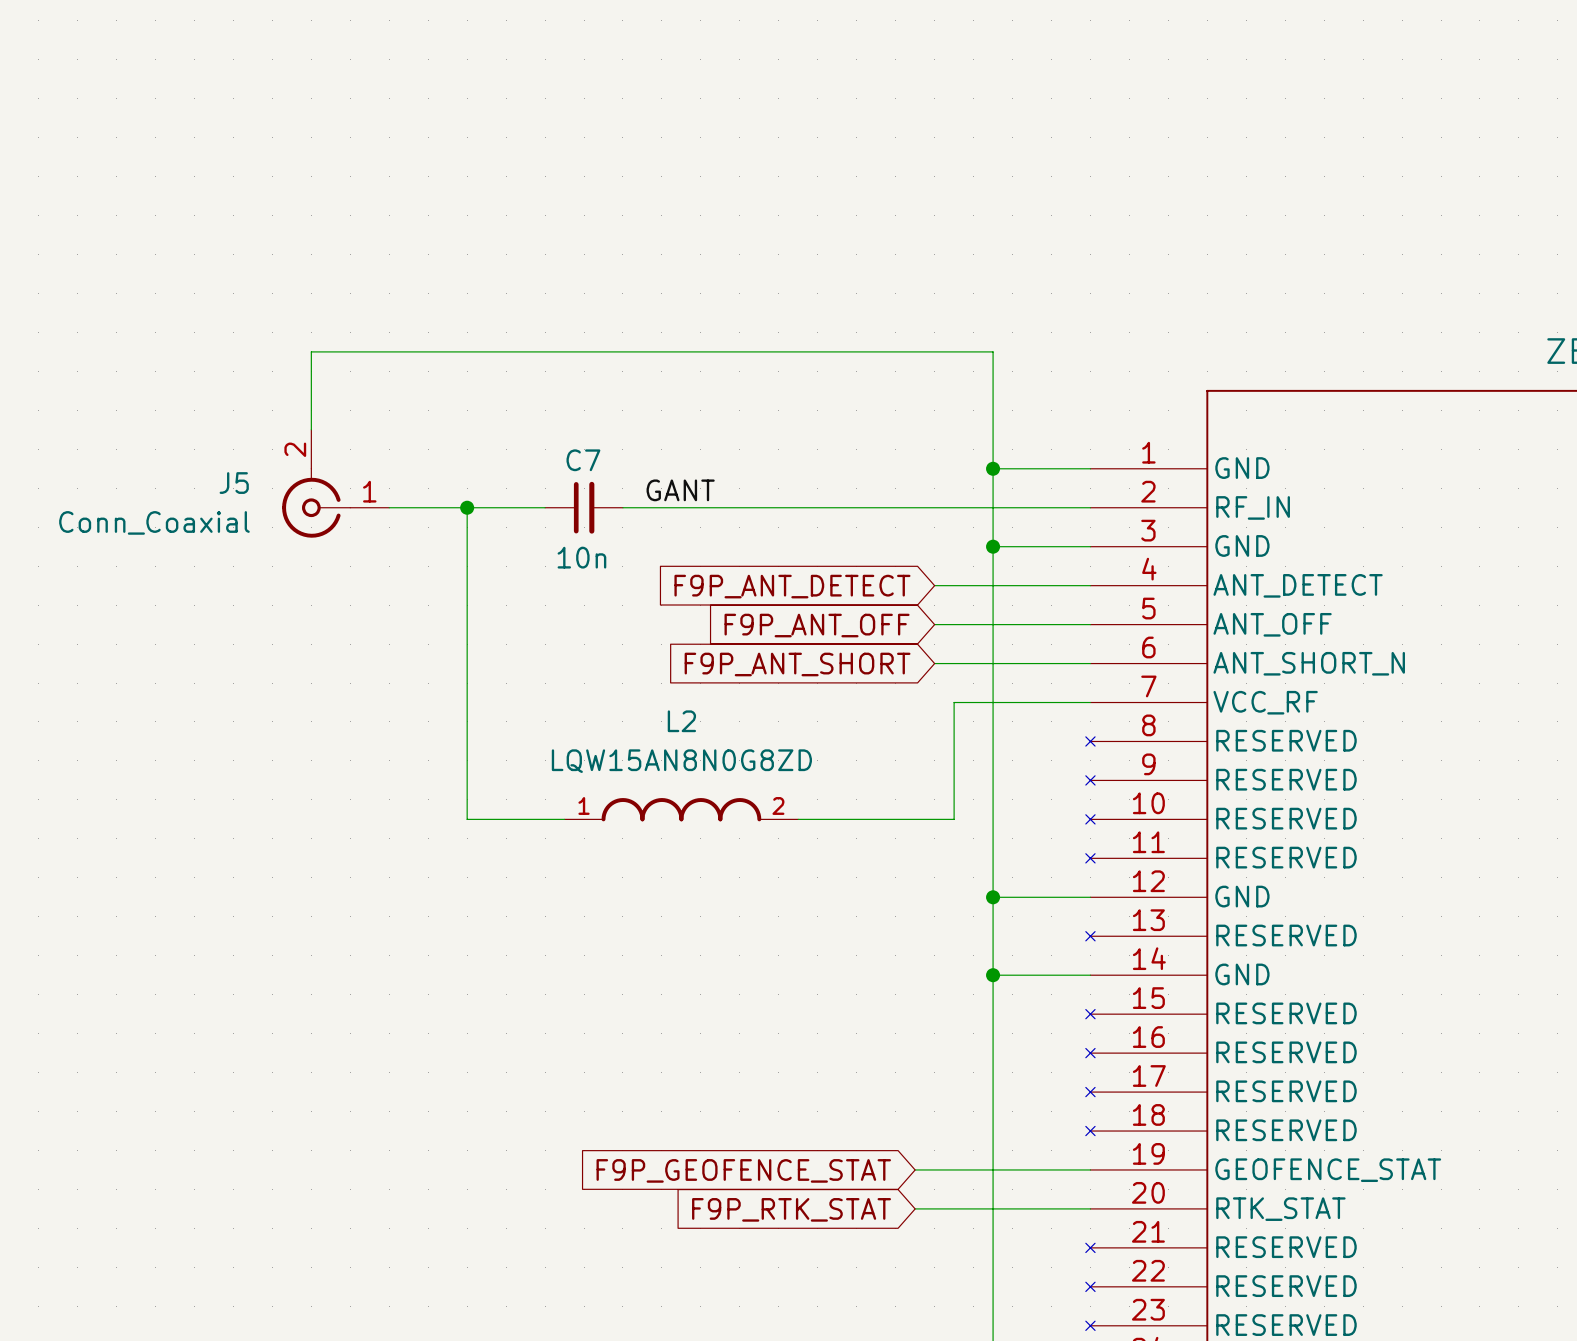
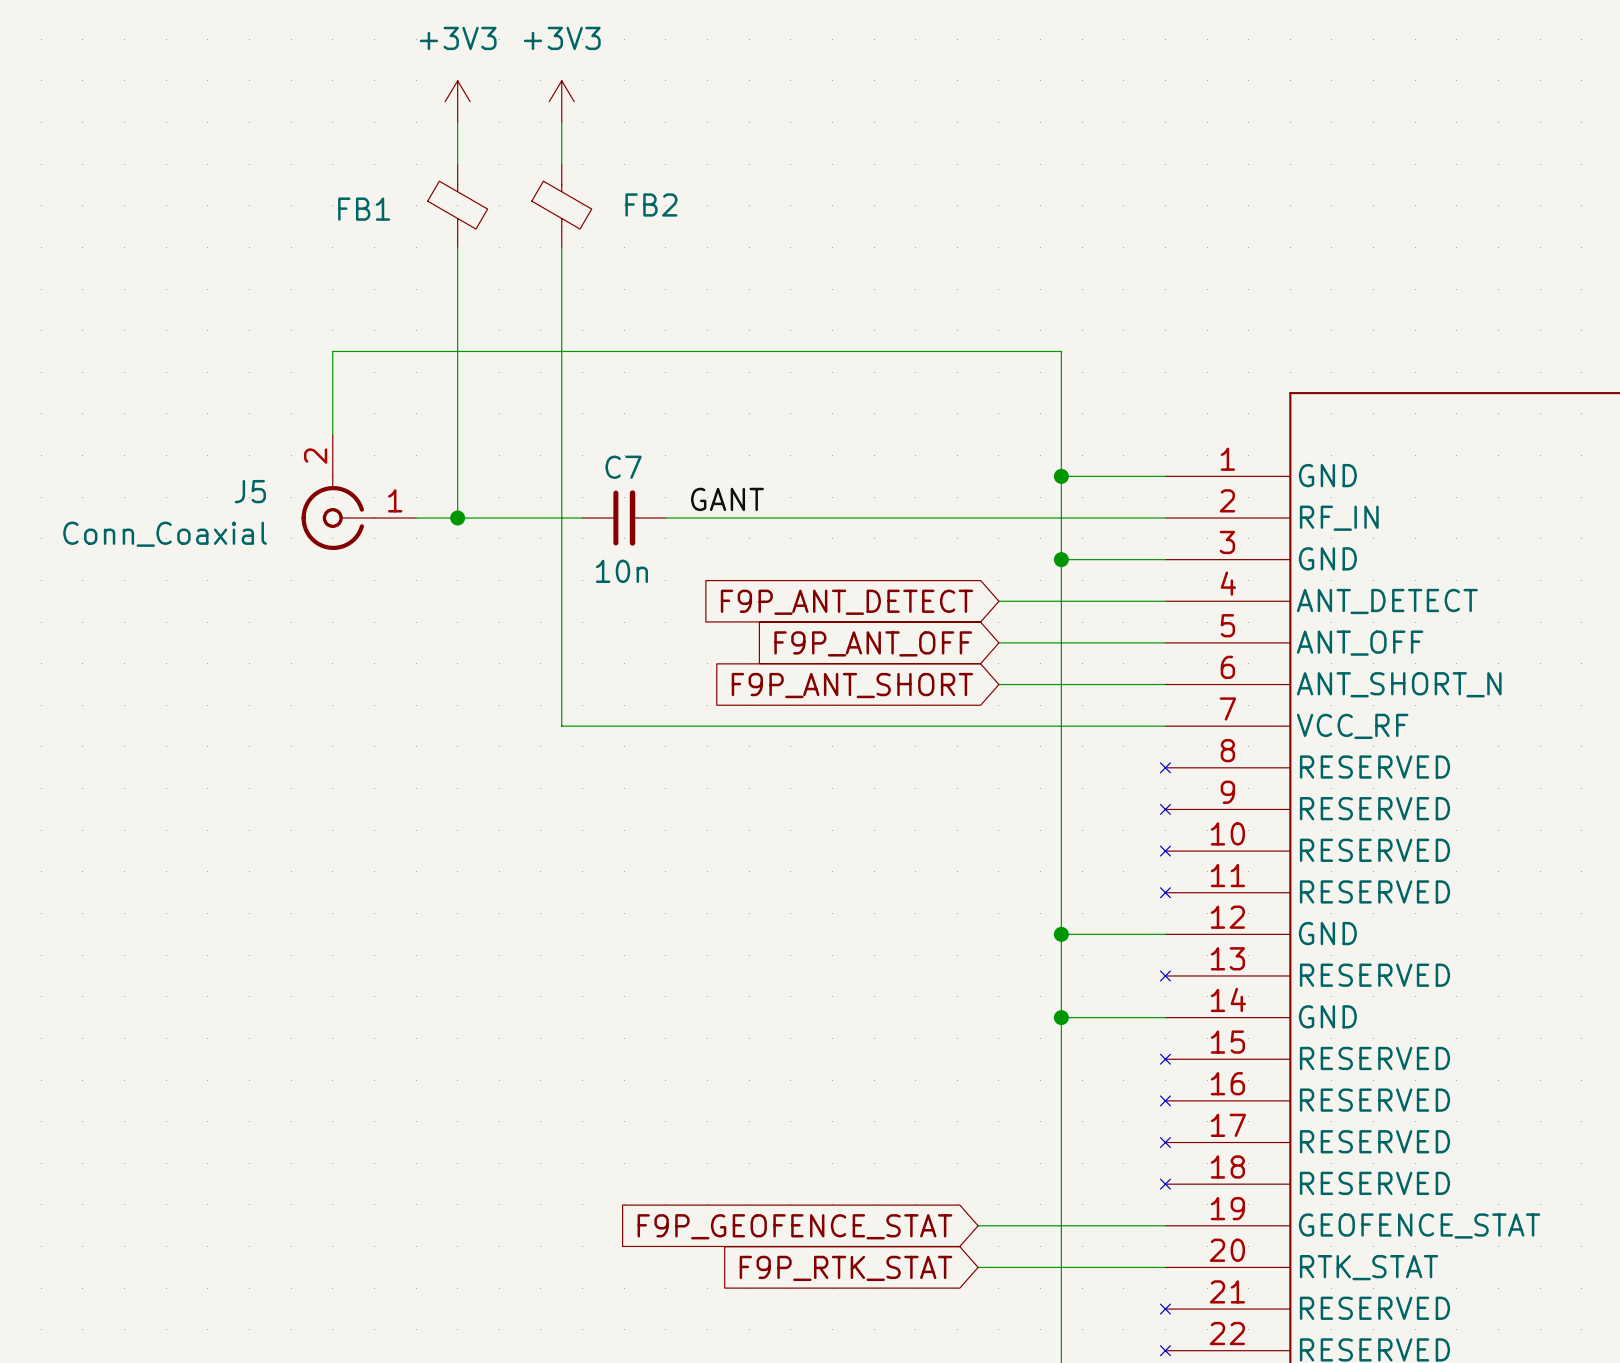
power symbol: none -> +3V3 (457, 101)
power symbol: none -> +3V3 (561, 101)
wire: none -> (457, 122) (457, 164)
wire: none -> (561, 122) (561, 164)
FB1: none -> (457, 205)
FB2: none -> (561, 205)
wire: none -> (457, 247) (457, 518)
wire: (467, 507) (467, 819) (564, 819) -> none
junction position: (467, 507) -> (457, 518)
wire: (954, 702) (954, 819) (798, 819) -> (1019, 726) (561, 726) (561, 247)
L2: LQW15AN8N0G8ZD (681, 809) -> none

